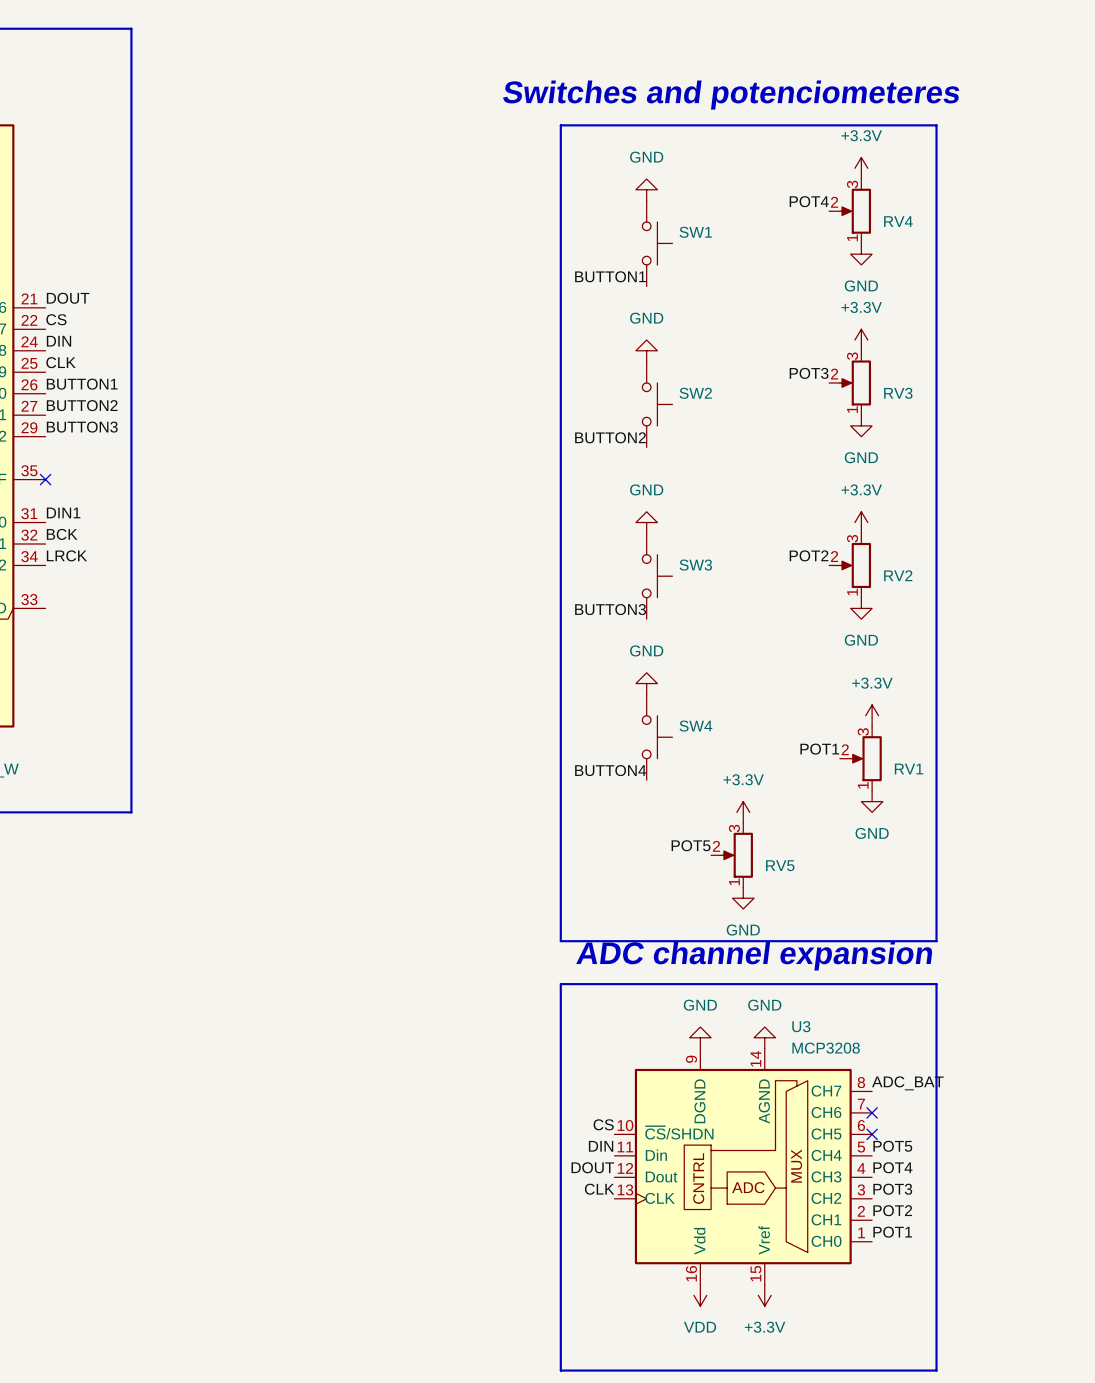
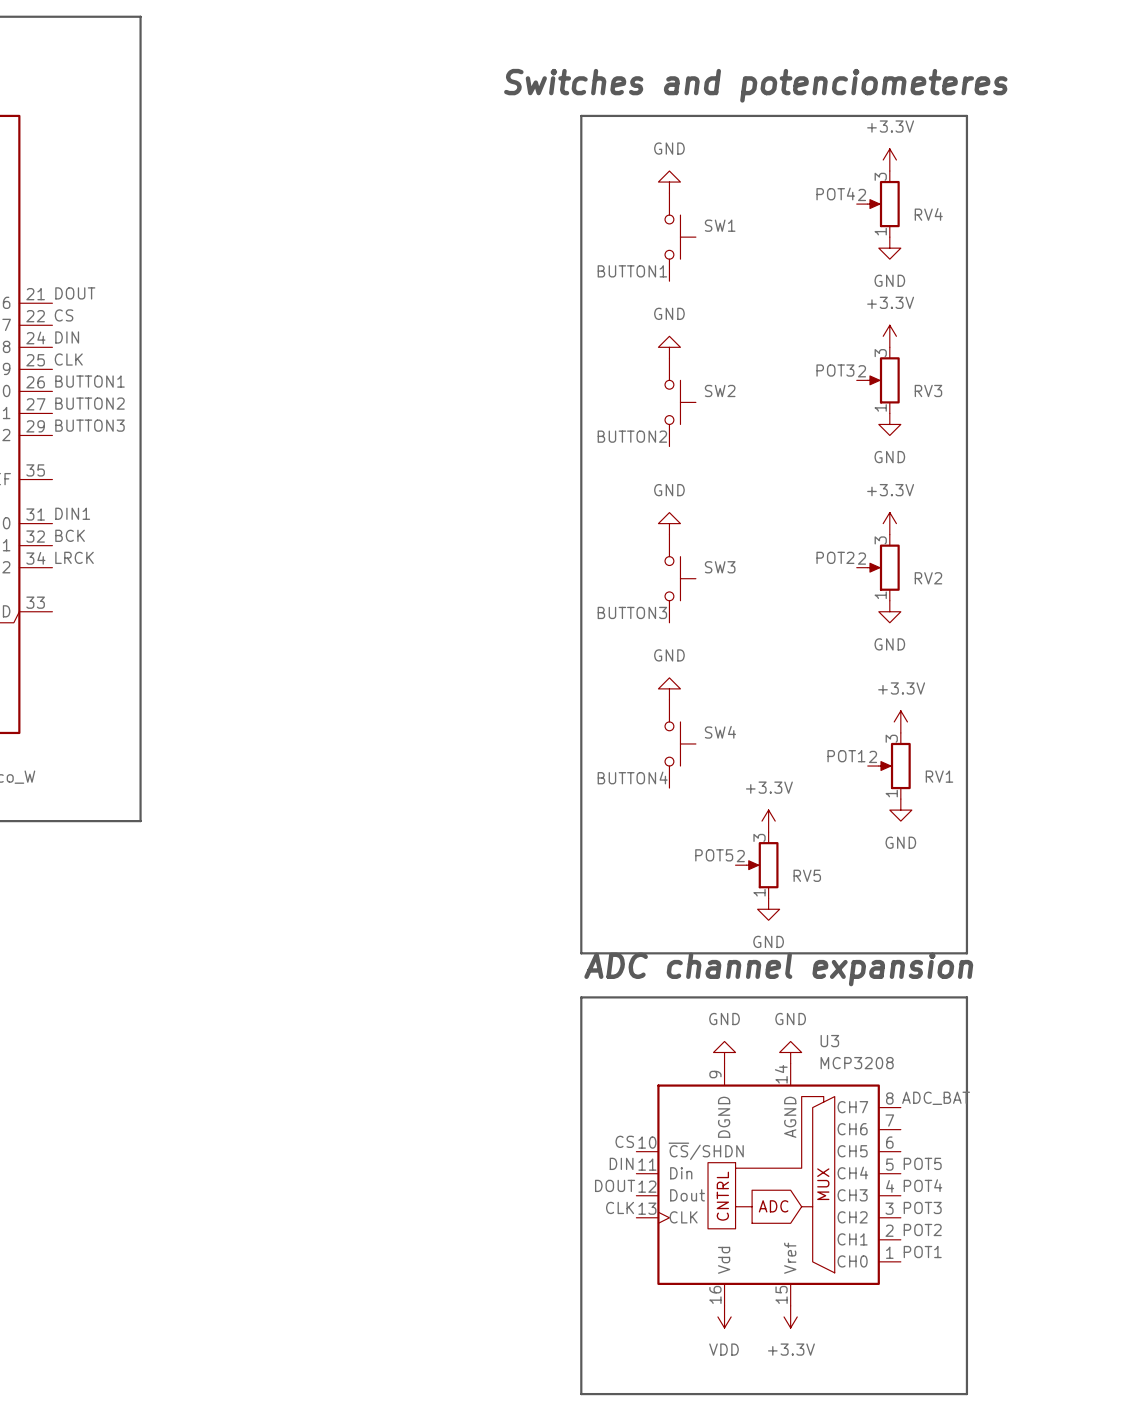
no-connect mark: (45, 479) -> none
no-connect mark: (872, 1112) -> none
no-connect mark: (872, 1134) -> none

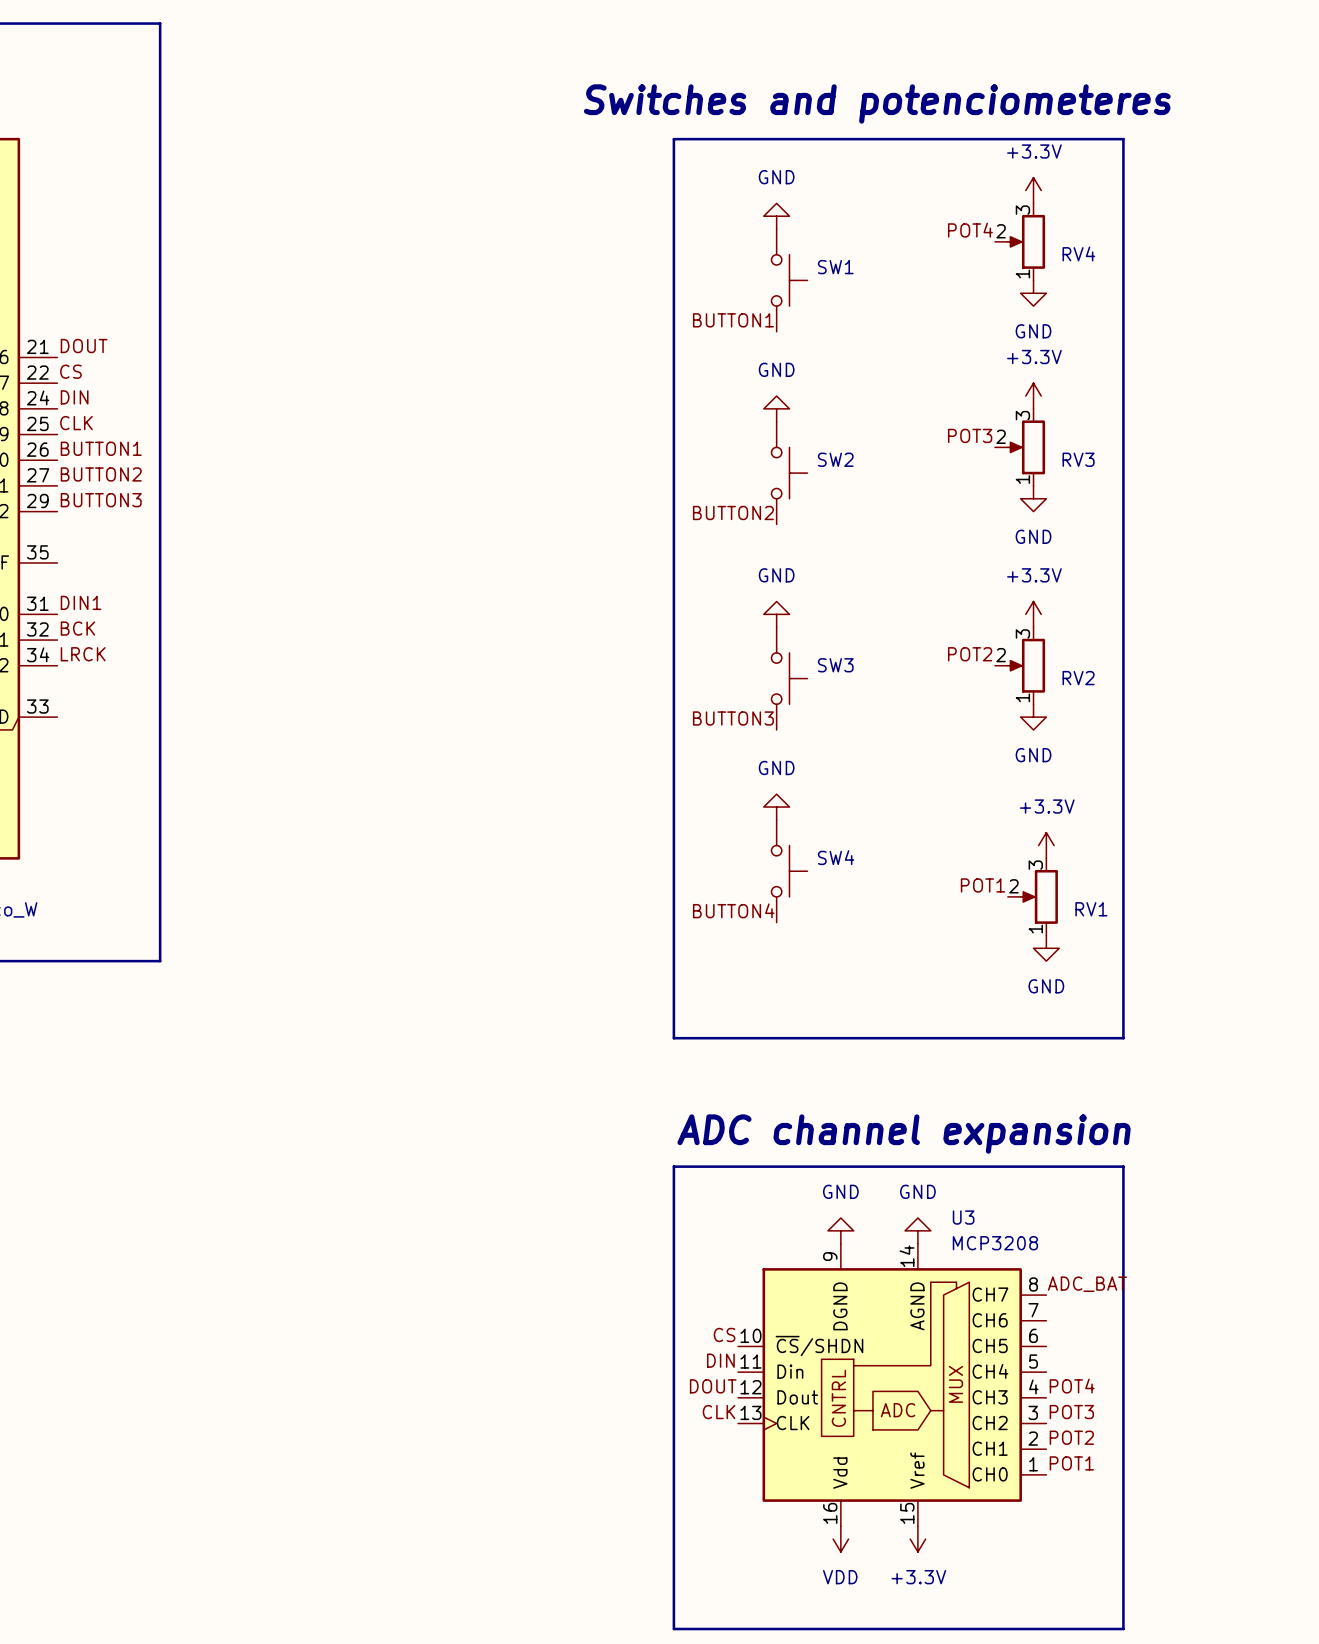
power symbol: +3.3V (768, 821) -> none
label: POT5 (714, 855) -> none
RV5: (757, 865) -> none
line: (581, 887) (581, 953) (966, 953) (966, 887) -> (673, 1038) (1123, 1038)
power symbol: GND (768, 909) -> none
label: POT5 (922, 1163) -> none

